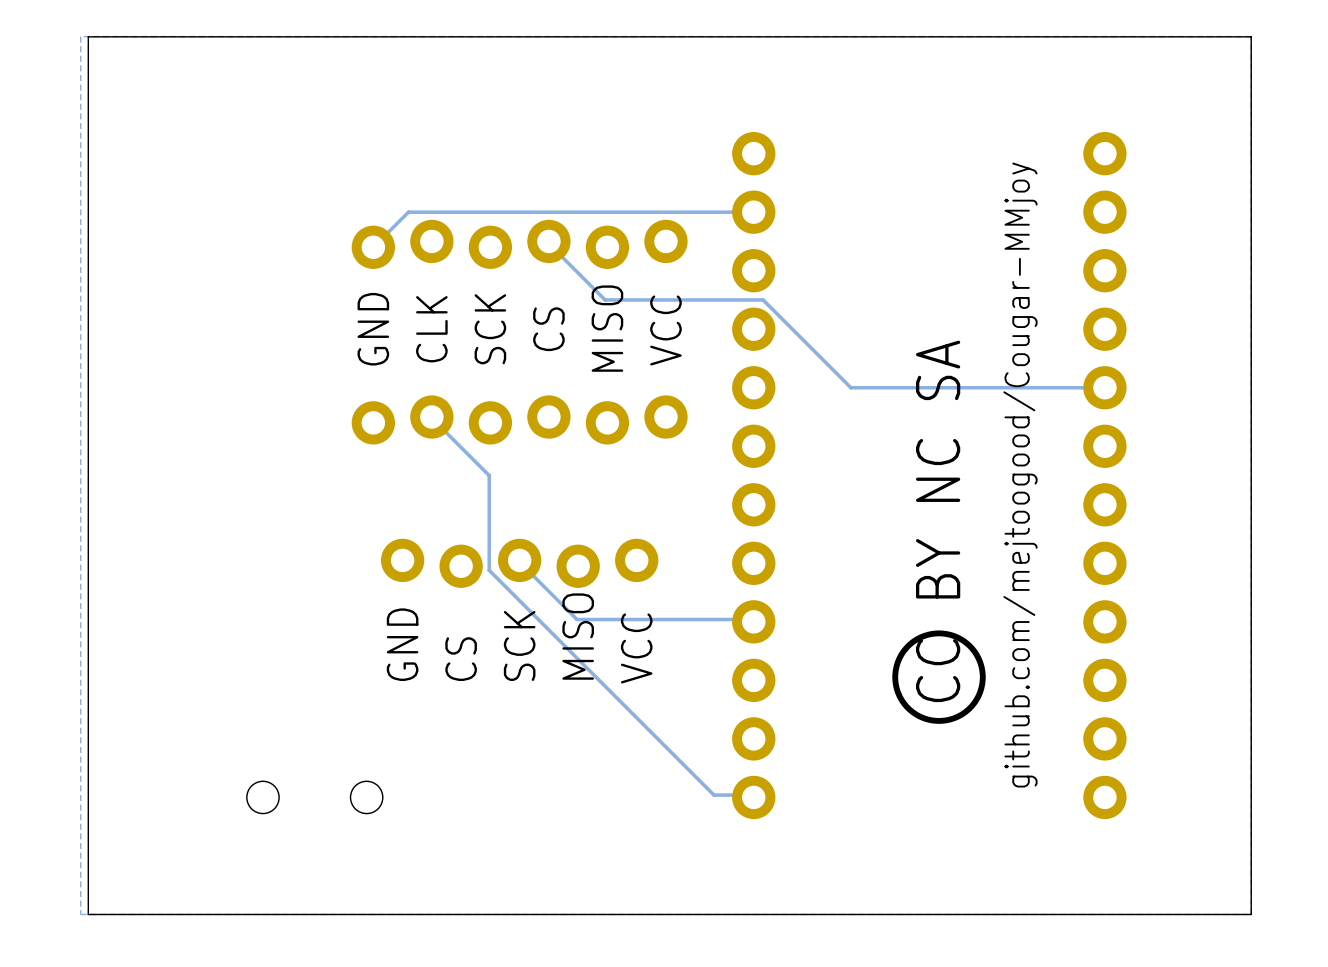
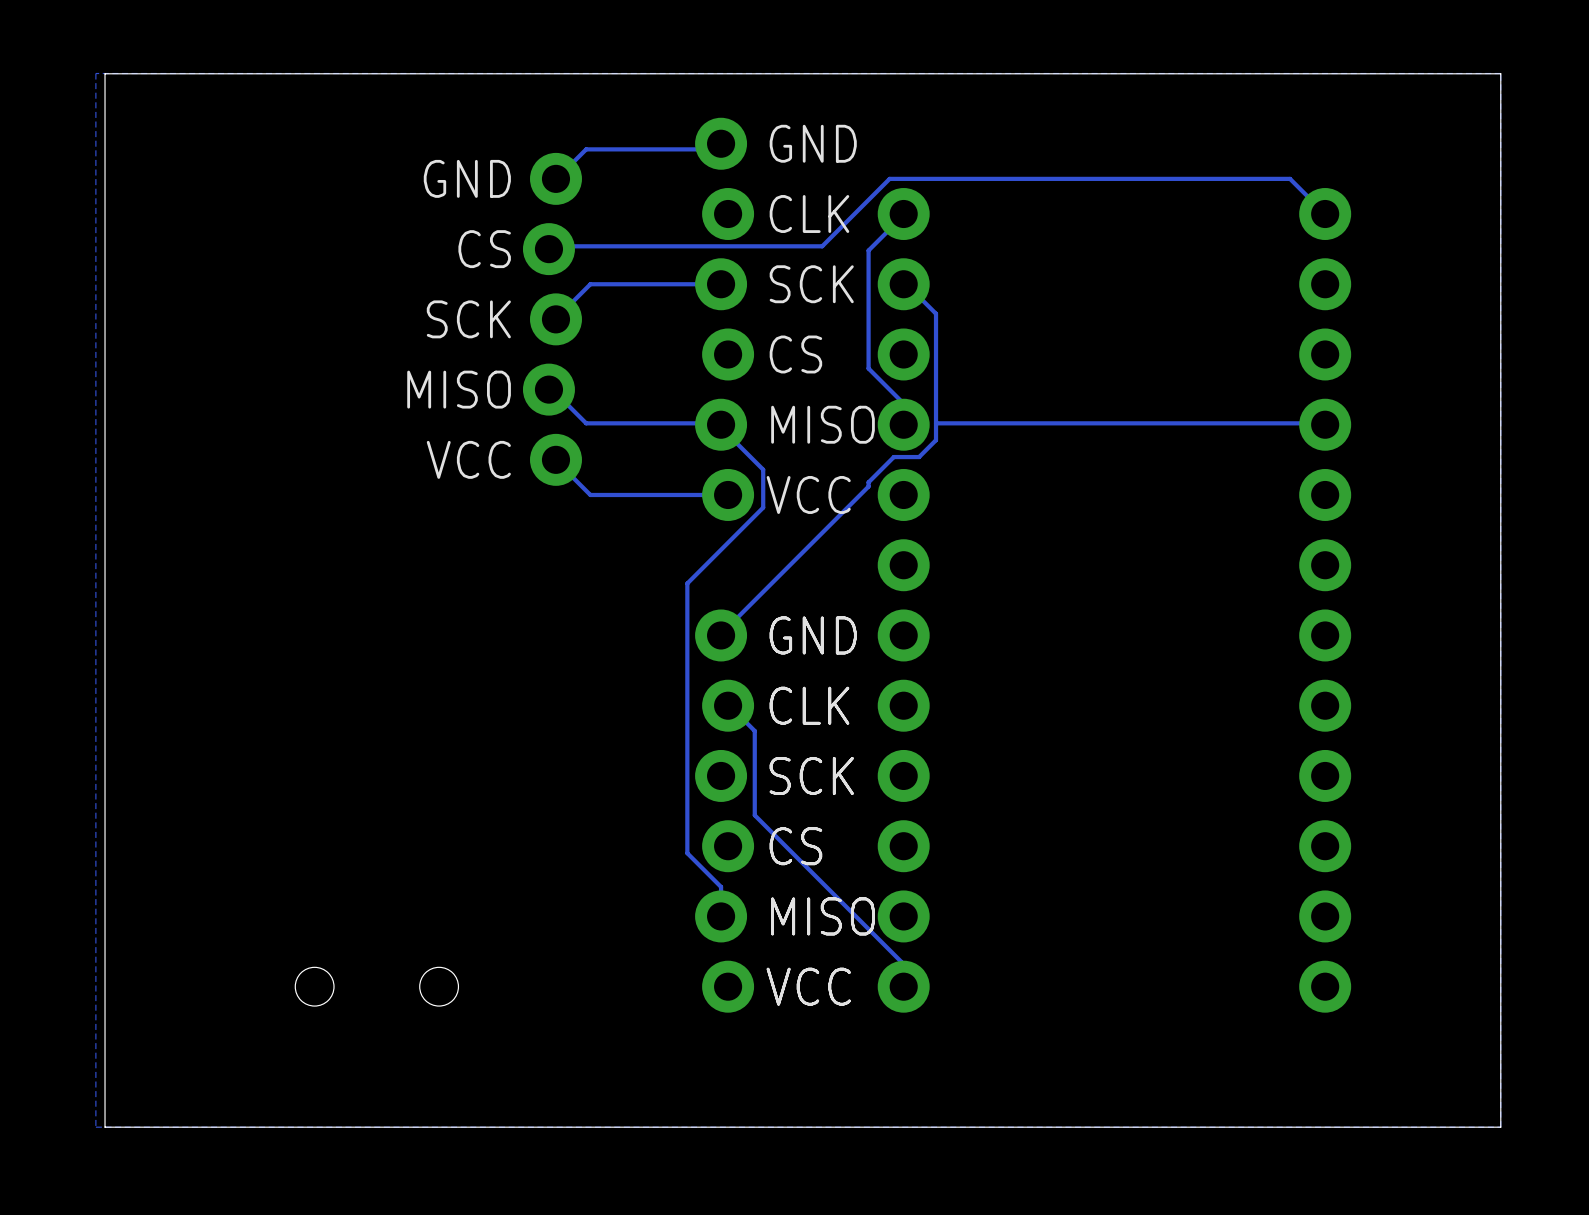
text: none -> GND (813, 143)
track: none -> (723, 147) (721, 143) (721, 149) (586, 149) (555, 178)
text: none -> GND (467, 178)
text: none -> CLK (809, 214)
track: none -> (903, 214) (868, 250) (868, 368) (902, 402) (903, 424)
track: none -> (1325, 214) (1290, 178) (889, 178) (822, 246) (552, 246) (548, 249)
text: none -> CS (484, 249)
track: (492, 212) (408, 212) (373, 247) -> (590, 284) (555, 319)
text: none -> SCK (811, 284)
track: (753, 212) (601, 212) -> (903, 284) (906, 284) (936, 313) (936, 440) (919, 457) (893, 457) (868, 482) (868, 486) (721, 635)
text: none -> SCK (468, 319)
track: (548, 241) (548, 243) (605, 299) (763, 299) (850, 387) (1104, 387) -> none
part rotation: 0° (519, 244) -> 90° clockwise (724, 319)
text: none -> CS (795, 354)
text: none -> MISO (459, 389)
track: none -> (548, 389) (552, 389) (586, 423) (721, 423) (721, 427) (763, 469) (763, 507) (687, 583) (687, 853) (721, 886) (721, 916)
text rotation: 0° (607, 328) -> 90° clockwise (823, 424)
track: none -> (936, 423) (1325, 424)
text: GND (373, 329) -> none
text: CLK (431, 329) -> none
text: SCK (490, 329) -> none
text: CS (548, 329) -> none
text rotation: 0° (665, 330) -> 90° clockwise (808, 494)
text: none -> VCC (468, 459)
track: none -> (555, 459) (590, 494) (728, 494)
track: (431, 417) (489, 475) (489, 570) (713, 795) (752, 795) -> (728, 705) (754, 731) (754, 815) (902, 962) (902, 983)
part: (519, 419) -> none
text: github.com/mejtoogood/Cougar-MMjoy (1020, 475) -> none
text: none -> GND (813, 635)
text: CC BY NC SA (938, 521) -> none
track: (519, 560) (577, 619) (752, 619) (753, 621) -> none
part rotation: 0° (519, 563) -> 90° clockwise (552, 319)
part position: (519, 563) -> (552, 319)
text: none -> CLK (809, 705)
drawing: [892, 630, 986, 724] -> none
text rotation: 0° (578, 636) -> 90° clockwise (823, 916)
text position: MISO (578, 636) -> MISO (823, 916)
text: GND (402, 644) -> none
text rotation: 0° (519, 645) -> 90° clockwise (811, 775)
text position: SCK (519, 645) -> SCK (811, 775)
text rotation: 0° (636, 648) -> 90° clockwise (808, 986)
text position: VCC (636, 648) -> VCC (808, 986)
part: none -> (724, 811)
text rotation: 0° (461, 659) -> 90° clockwise (795, 846)
text position: CS (461, 659) -> CS (795, 846)

